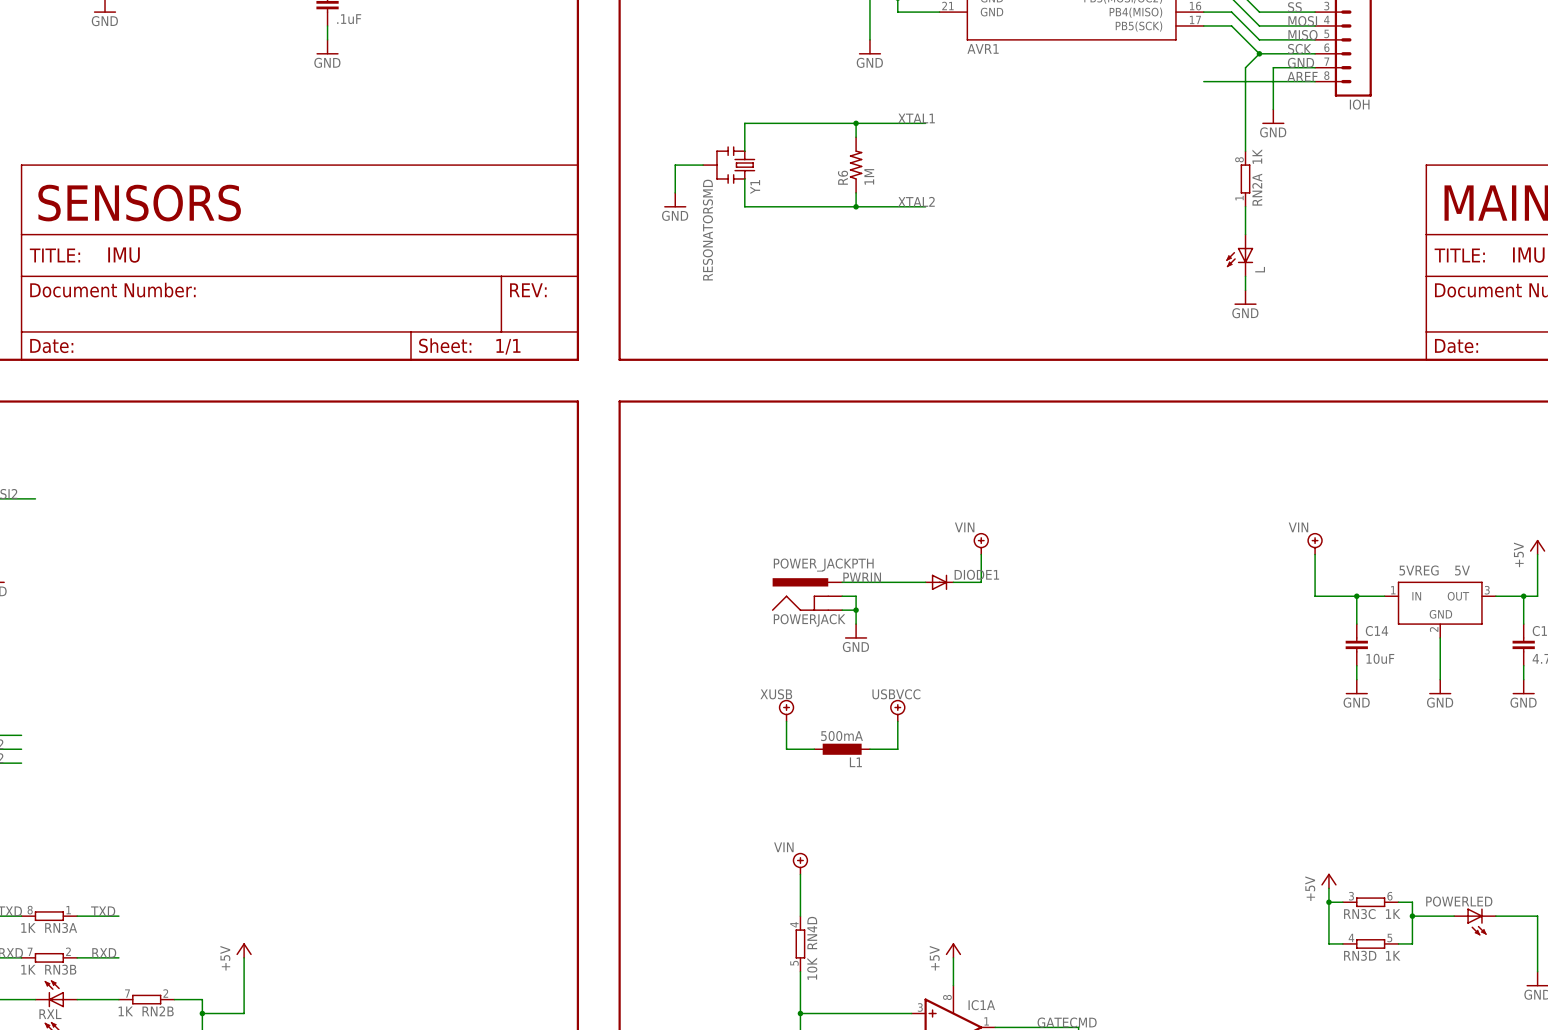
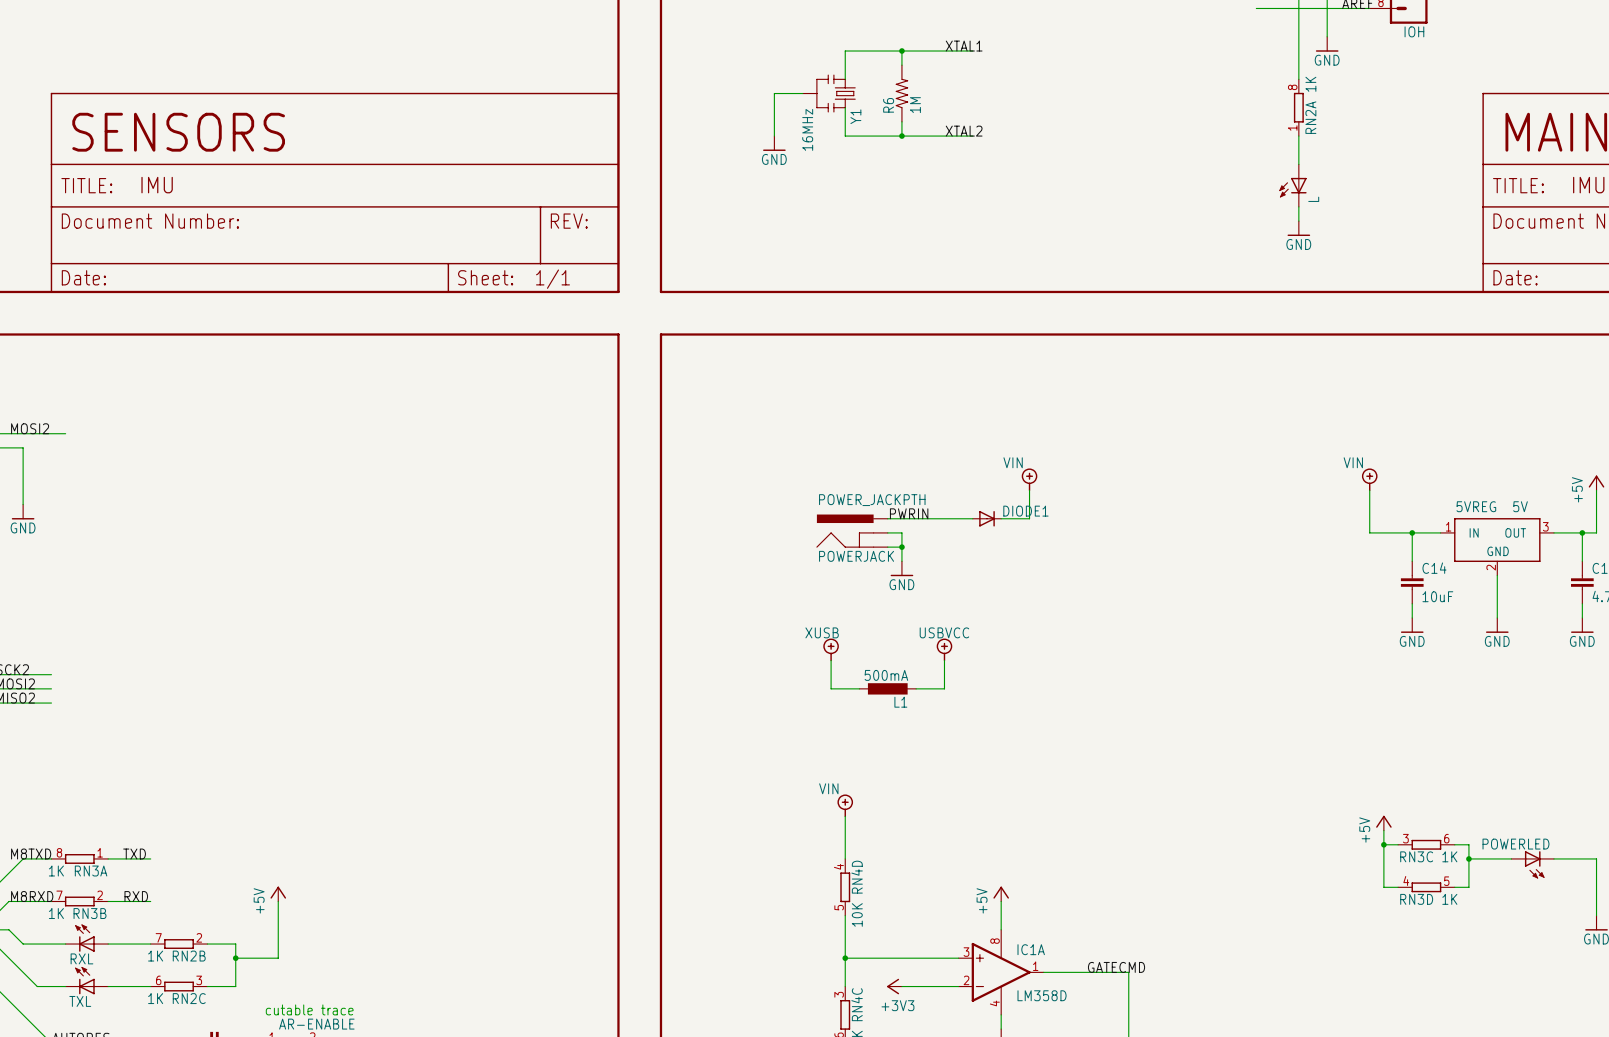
wire: (800, 123) (744, 123) (744, 151) -> (845, 51) (845, 79)
wire: (703, 165) (675, 165) (675, 192) -> none
Y1 position: (728, 165) -> (828, 93)
wire: none -> (802, 93) (774, 93) (774, 136)
wire: (744, 178) (744, 206) (800, 206) -> (845, 107) (845, 136)
power symbol position: GND (675, 200) -> GND (774, 143)
Y1 value: RESONATORSMD (707, 230) -> 16MHz (807, 129)

